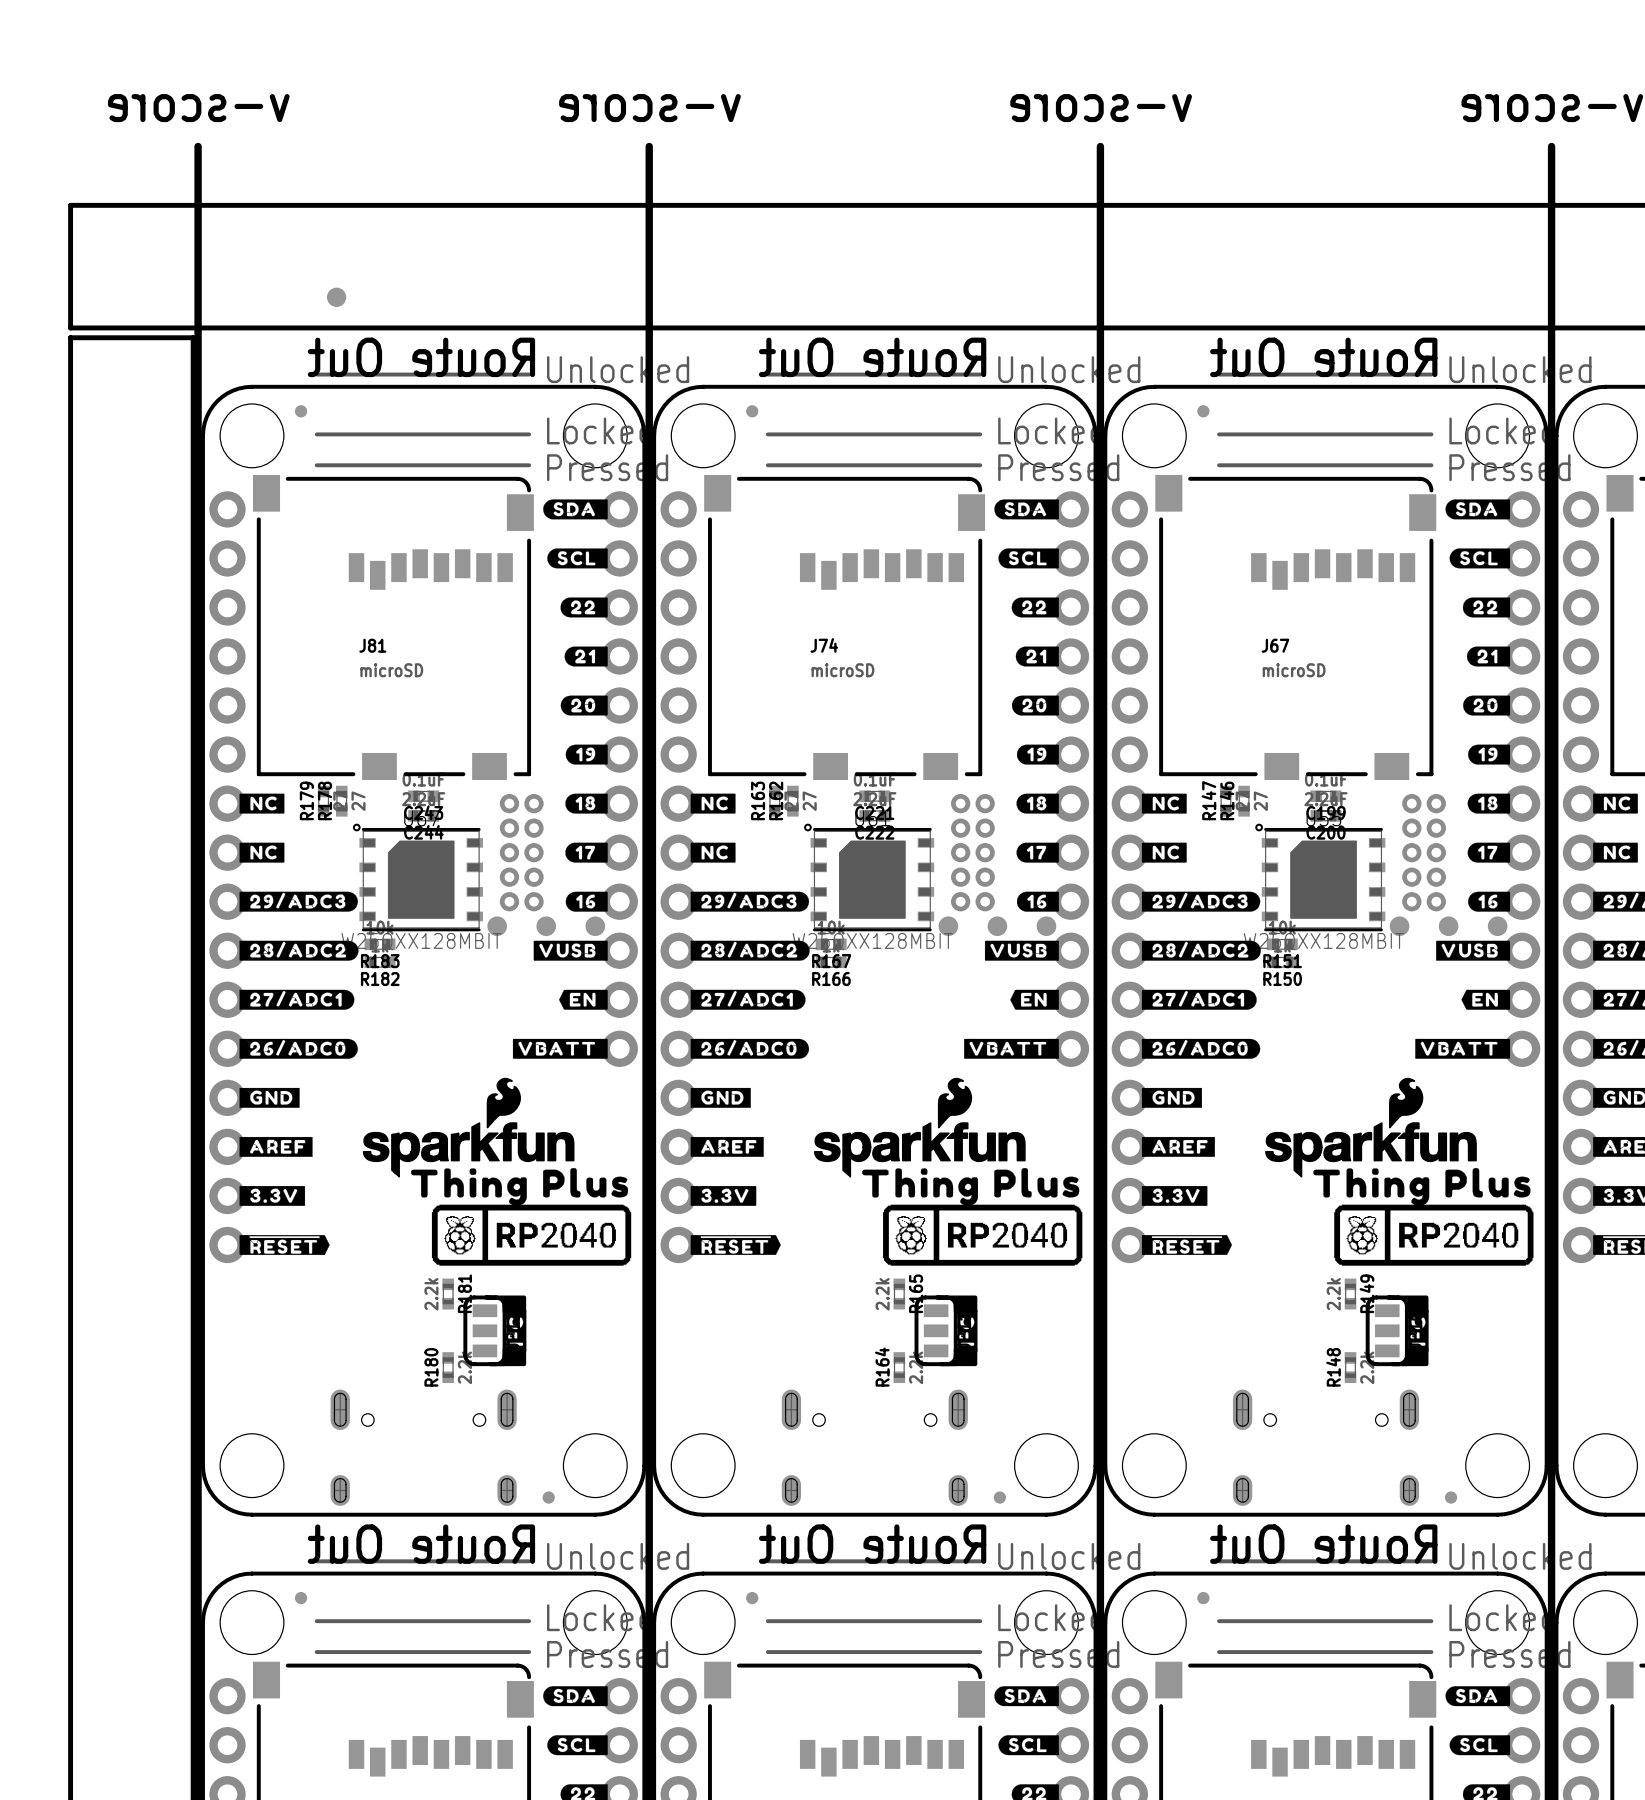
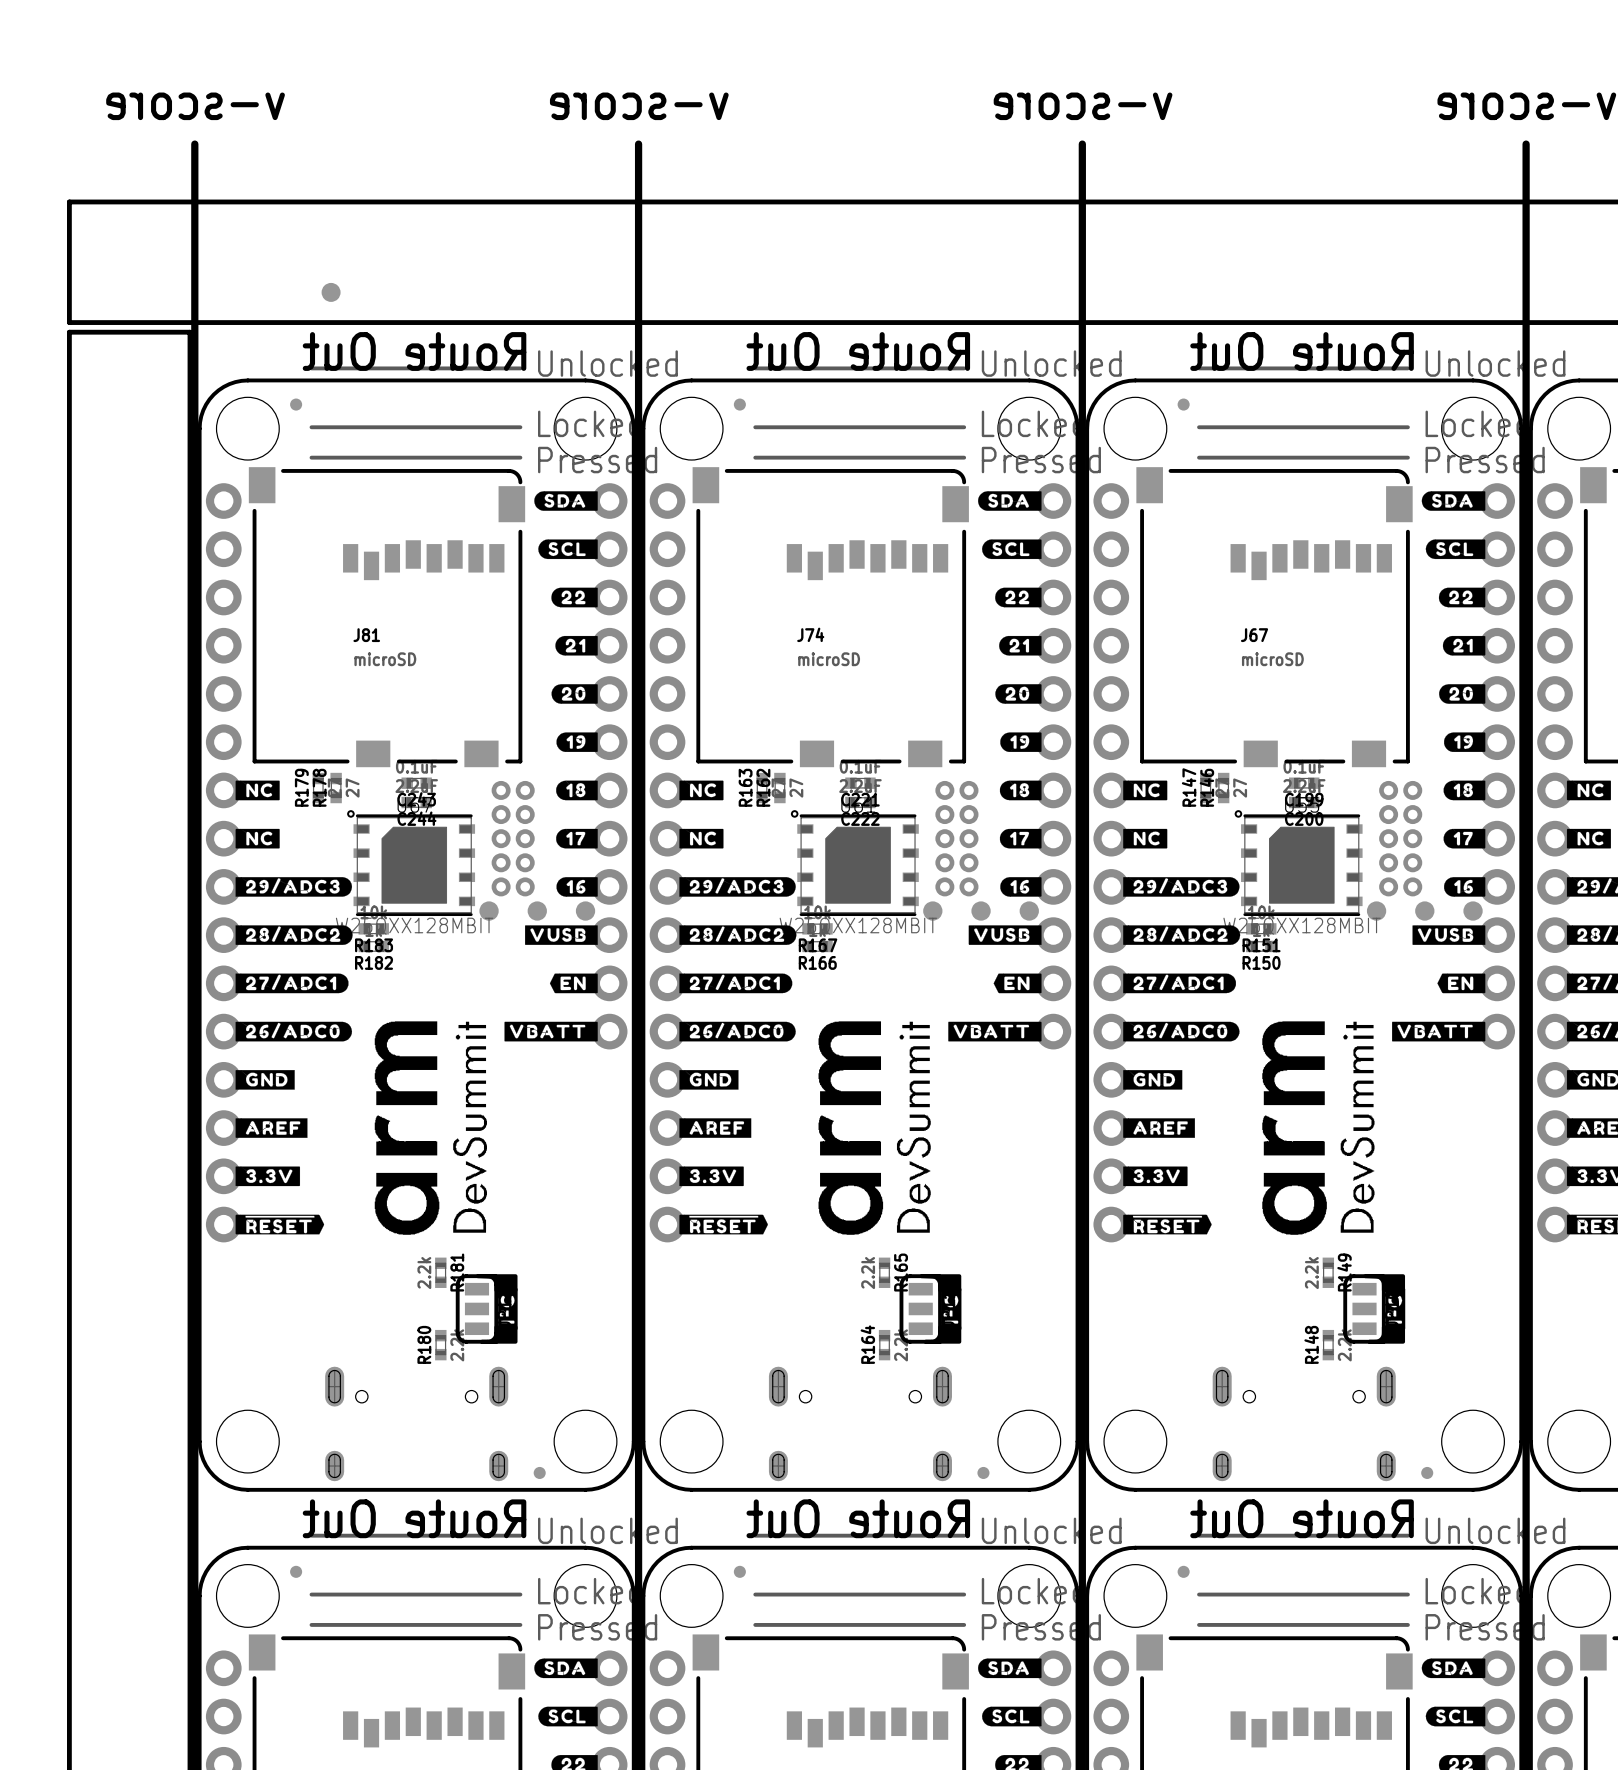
drawing: none -> [374, 1021, 488, 1235]
drawing: none -> [818, 1021, 931, 1235]
drawing: none -> [1262, 1021, 1375, 1235]
drawing: [362, 1077, 632, 1266] -> none
drawing: [813, 1077, 1083, 1266] -> none
drawing: [1265, 1077, 1534, 1266] -> none

